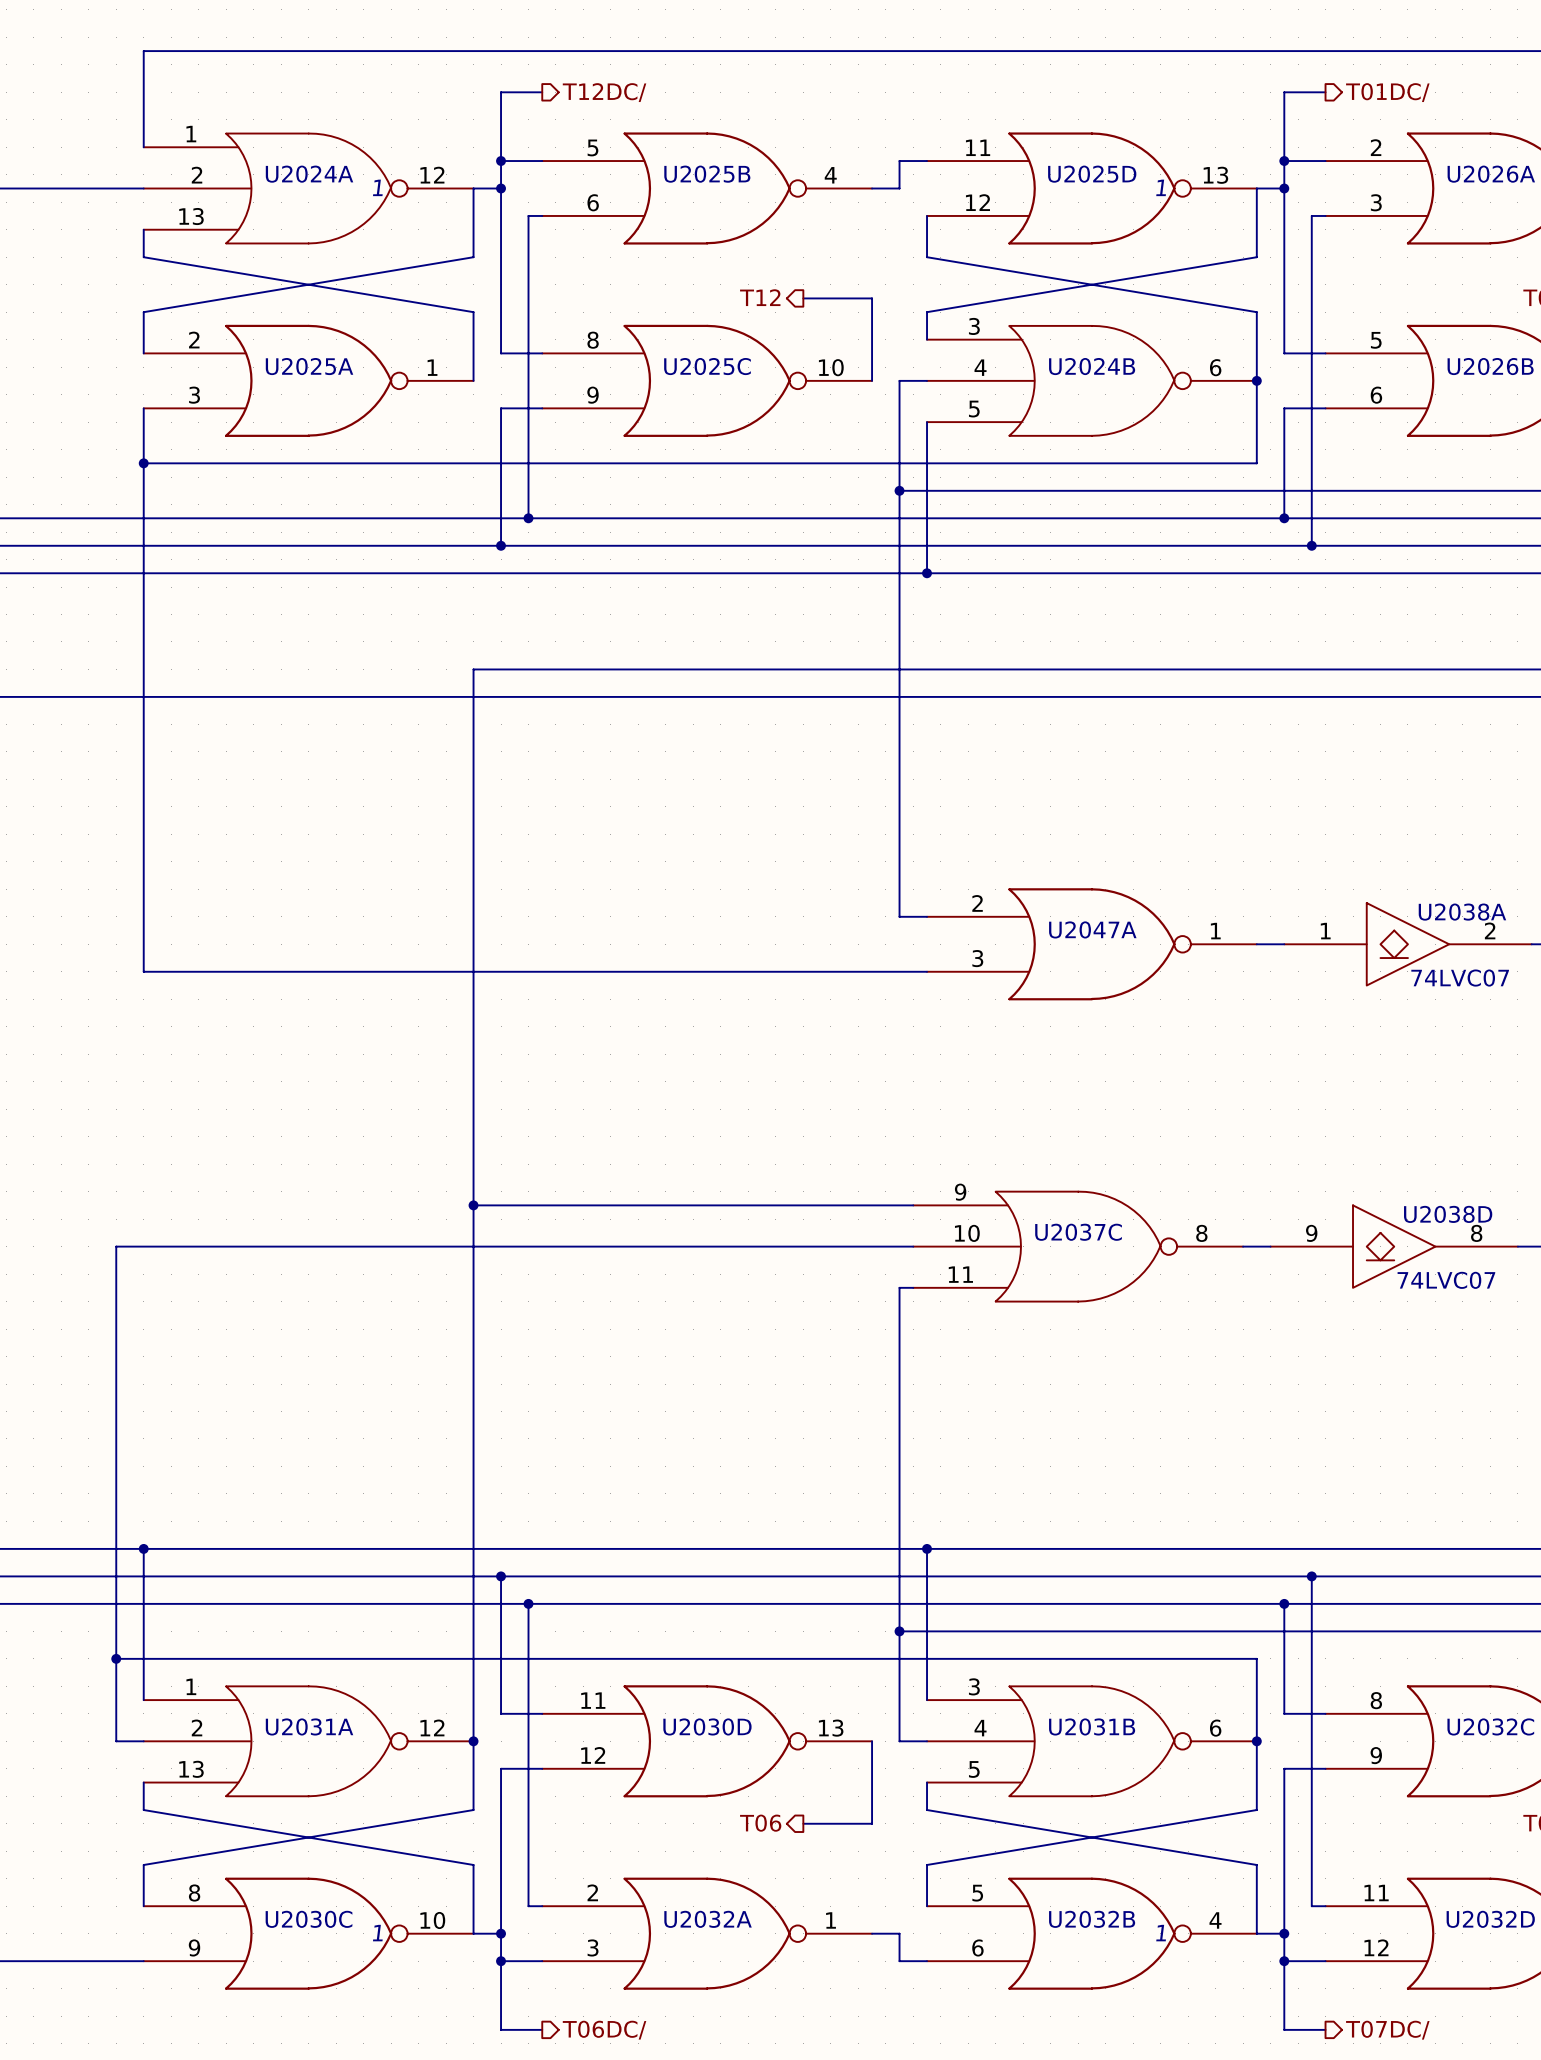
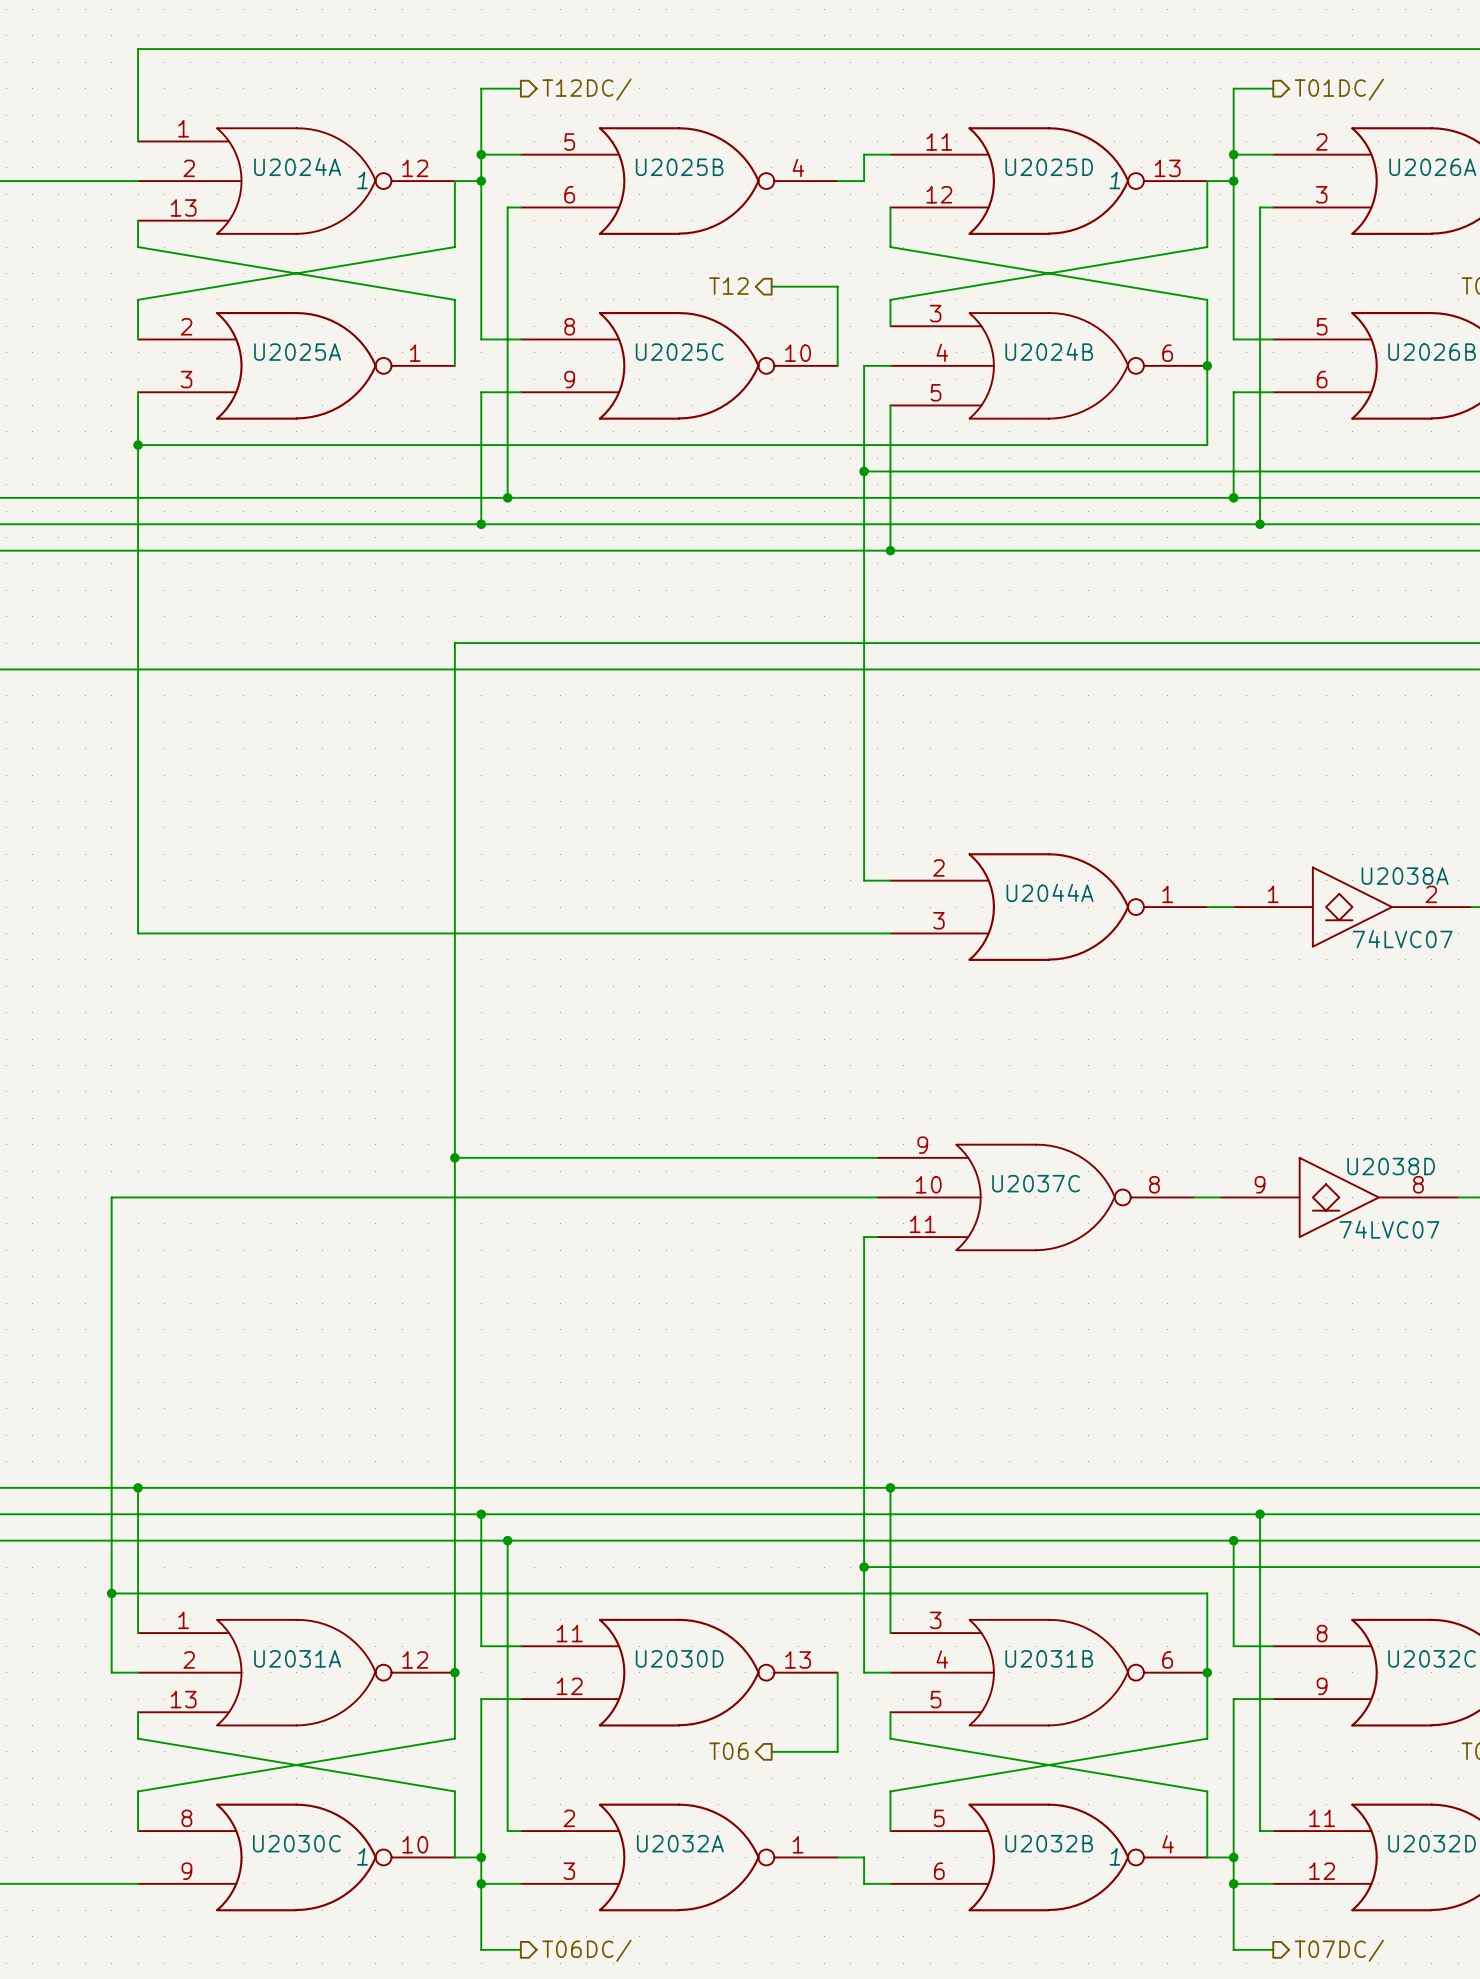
U2047A name: U2047A (1092, 929) -> U2044A (1050, 892)

